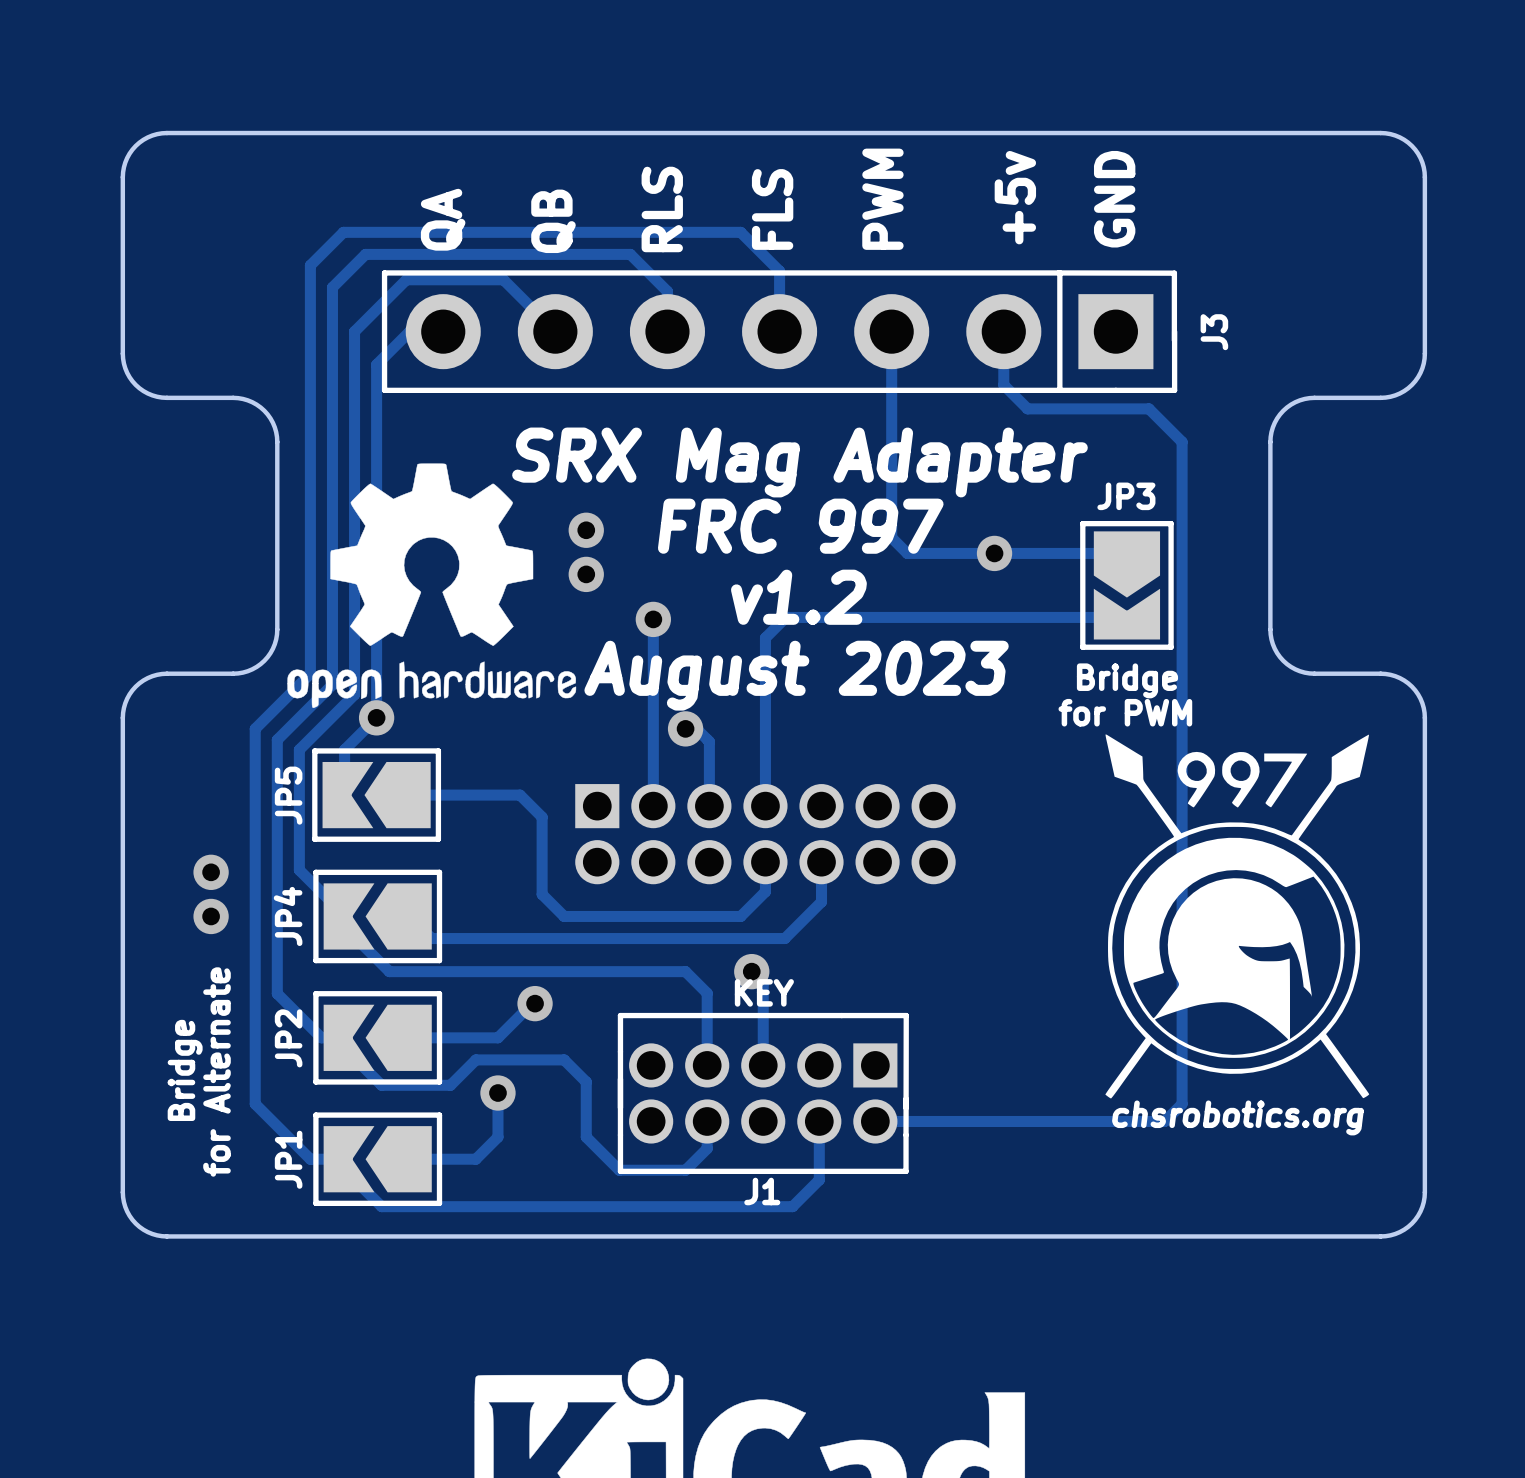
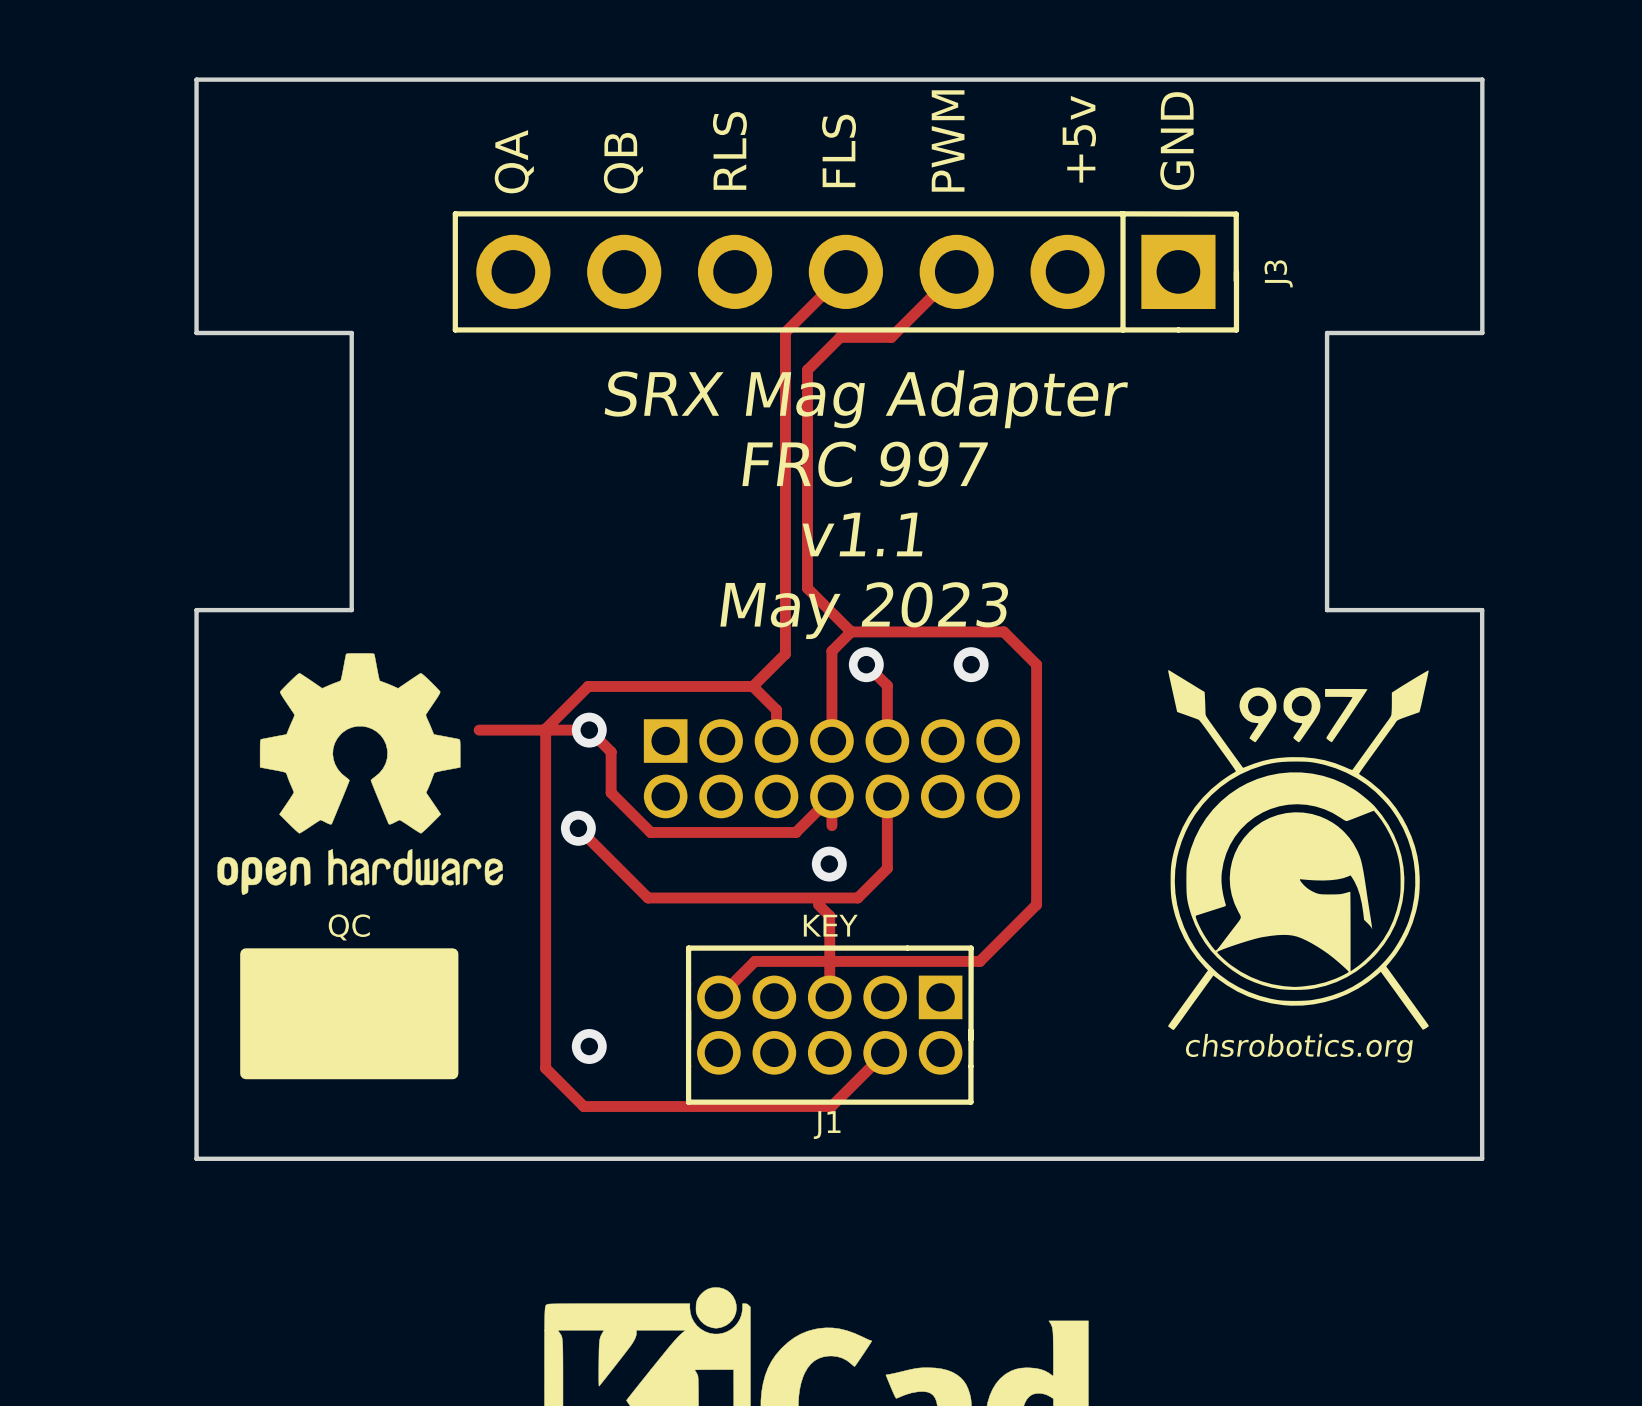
board edge: (122, 177) (125, 162) (135, 145) (147, 137) (166, 133) (1380, 133) (1399, 137) (1408, 142) (1418, 153) (1424, 172) (1424, 353) (1420, 372) (1408, 388) (1390, 396) (1309, 398) (1295, 402) (1280, 414) (1274, 422) (1270, 437) (1271, 639) (1277, 653) (1287, 664) (1299, 671) (1314, 673) -> (196, 119) (196, 79) (1482, 79) (1482, 333) (1327, 333) (1327, 610) (1374, 610)
track: (443, 331) (409, 331) (376, 364) (376, 717) (344, 749) (344, 795) -> none
track: (555, 331) (503, 279) (406, 279) (354, 331) (354, 694) (299, 749) (299, 870) (345, 916) (345, 927) (389, 971) (685, 971) (707, 993) (707, 1065) -> none
track: (667, 331) (667, 291) (630, 254) (365, 254) (332, 287) (332, 684) (277, 739) (277, 993) (321, 1037) (345, 1037) (345, 1049) (381, 1085) (450, 1085) (475, 1059) (564, 1059) (586, 1081) (586, 1137) (619, 1170) (685, 1170) (707, 1148) (707, 1121) -> none
track: (779, 331) (779, 271) (740, 232) (343, 232) (310, 265) (310, 673) (255, 728) (255, 1104) (310, 1159) (345, 1159) (345, 1170) (381, 1206) (792, 1206) (819, 1179) (819, 1121) -> (845, 271) (785, 332) (785, 653) (752, 686)
track: (891, 331) (891, 537) (907, 553) (1126, 553) -> (956, 271) (891, 337) (840, 337) (807, 370) (807, 588) (851, 631)
track: (1003, 331) (1003, 385) (1027, 408) (1149, 408) (1182, 441) (1182, 1104) (1164, 1121) (875, 1121) -> none
board edge: (122, 353) (125, 368) (129, 377) (135, 384) (147, 393) (162, 397) (242, 398) (260, 407) (267, 414) (274, 427) (277, 441) (277, 634) (270, 653) (260, 664) (247, 671) (233, 673) -> (196, 293) (196, 333) (351, 333) (351, 610) (305, 610)
via: (586, 530) -> none
via: (994, 553) -> none
via: (586, 574) -> none
drawing position: (431, 585) -> (360, 774)
JP3: (1126, 585) -> none
text: v1.2 (798, 597) -> v1.1 (862, 534)
track: (1126, 617) (785, 617) (765, 637) (765, 715) -> (851, 631) (831, 651)
track: (652, 618) (653, 806) -> none
via: (653, 619) -> none
board edge: (166, 673) (147, 678) (135, 686) (125, 703) (122, 717) -> (240, 610) (196, 610) (196, 653)
board edge: (1380, 673) (1399, 678) (1411, 686) (1422, 703) (1424, 717) (1424, 1197) (1422, 1206) (1415, 1219) (1408, 1226) (1395, 1233) (1380, 1236) (166, 1236) (147, 1232) (135, 1223) (127, 1211) (122, 1192) -> (1440, 610) (1482, 610) (1482, 1158) (196, 1158) (196, 1122)
text: August 2023 (796, 675) -> May 2023 (864, 610)
text: Bridge (1127, 680) -> none
track: none -> (851, 631) (1003, 631) (1036, 664) (1036, 904) (979, 961) (754, 961) (718, 997)
text: for PWM (1125, 712) -> none
via: (376, 717) -> none
track: (685, 728) (696, 728) (709, 741) (709, 774) -> (752, 686) (776, 710)
via: (685, 728) -> none
track: none -> (866, 664) (887, 685) (887, 741)
via: none -> (866, 664)
via: none -> (971, 664)
track: none -> (752, 686) (588, 686) (545, 729) (545, 1068) (583, 1106) (831, 1106) (885, 1052)
JP5: (376, 795) -> none
via: none -> (589, 730)
track: (542, 858) (542, 894) (564, 916) (740, 916) (765, 891) -> (611, 792) (650, 832) (795, 832) (831, 796)
via: (211, 872) -> none
via: none -> (578, 828)
track: (821, 901) (784, 938) (431, 938) (409, 916) -> (887, 835) (887, 868) (857, 897) (648, 897) (578, 828)
via: (211, 916) -> none
JP4: (377, 916) -> none
via position: (751, 971) -> (829, 864)
text: none -> QC (349, 927)
track: (535, 1003) (532, 1003) (497, 1037) (409, 1037) -> none
via: (535, 1003) -> none
drawing: none -> [240, 948, 459, 1080]
JP2: (377, 1037) -> none
text: Bridge (185, 1070) -> none
text: for Alternate (217, 1071) -> none
track: (497, 1093) (497, 1137) (475, 1159) (409, 1159) -> none
via position: (497, 1093) -> (589, 1046)
JP1: (377, 1159) -> none

